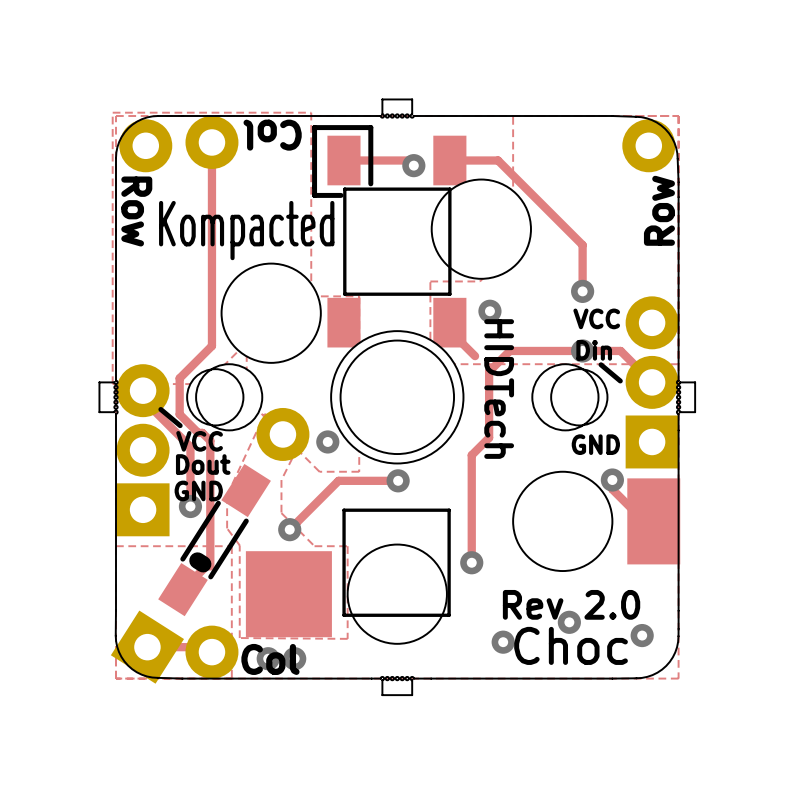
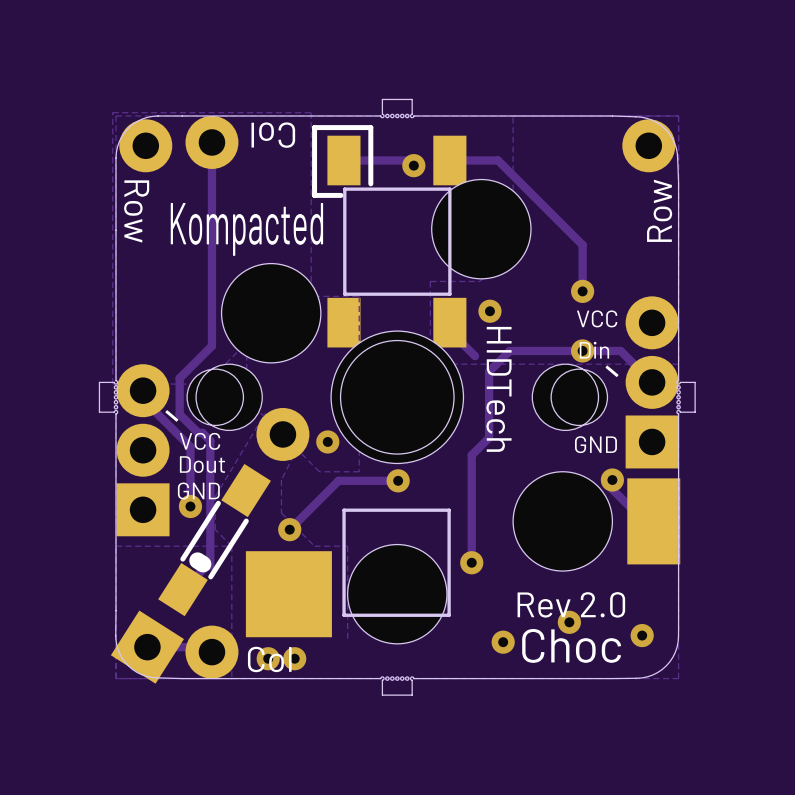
zone outline: (264, 413) (227, 495) (227, 528) (239, 545) (239, 638) (347, 638) -> (264, 413) (215, 496) (215, 529) (231, 546)

